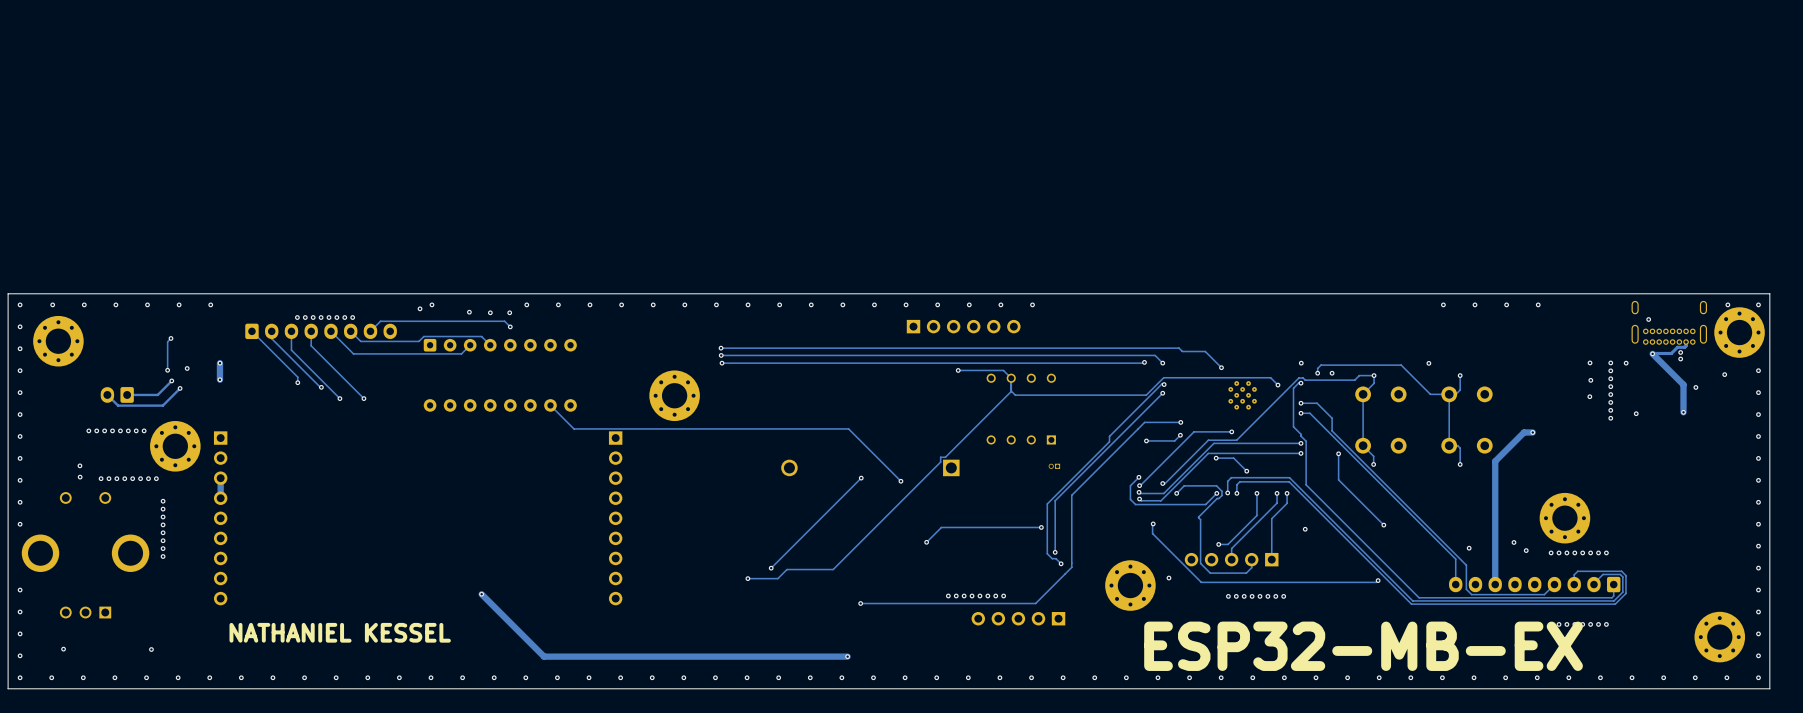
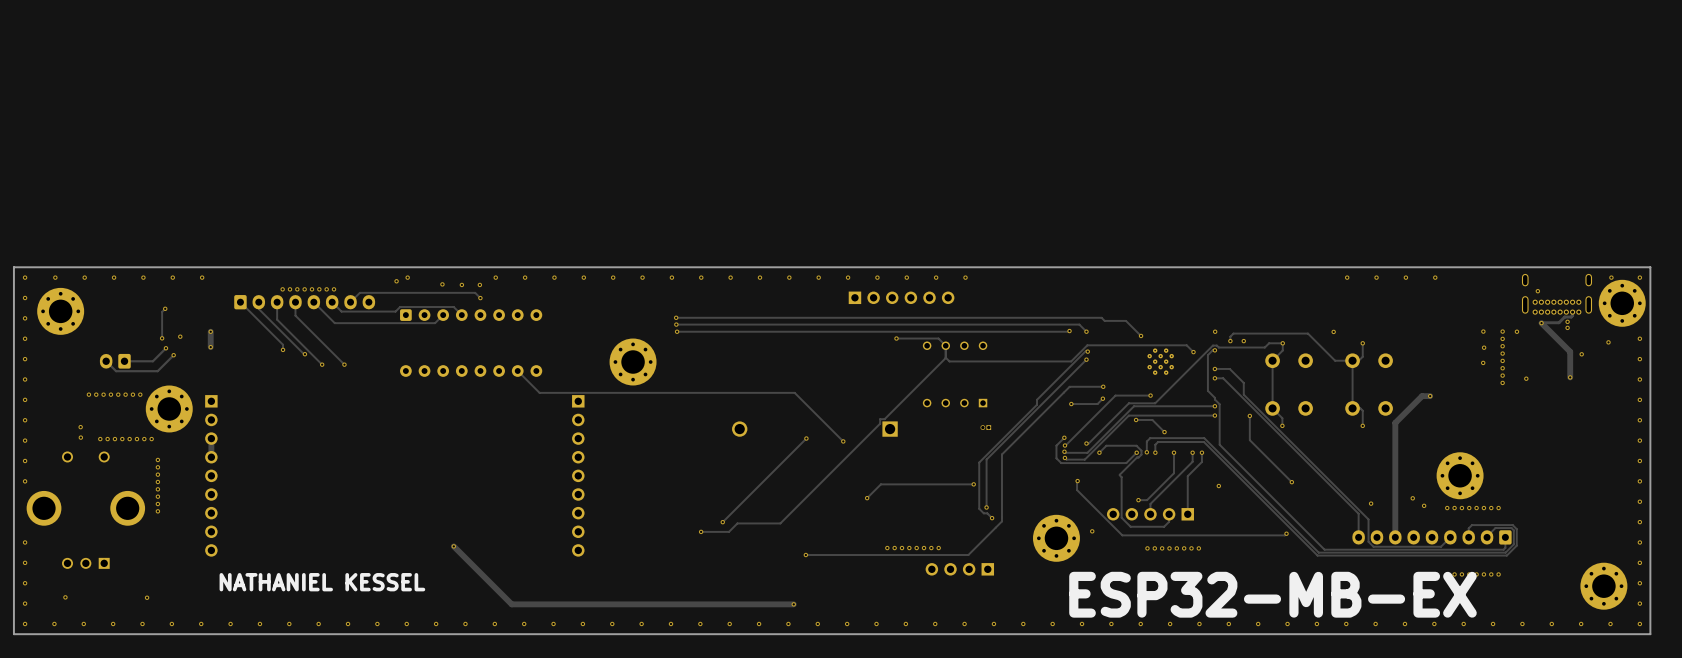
part: (1018, 618) -> none
part: none -> (959, 569)

